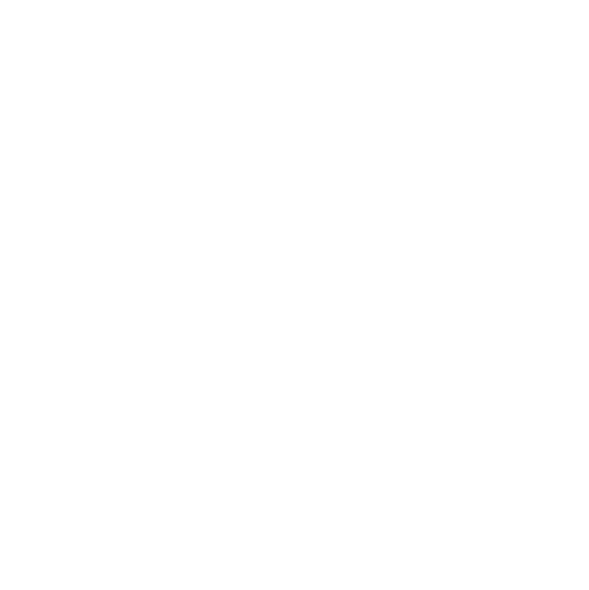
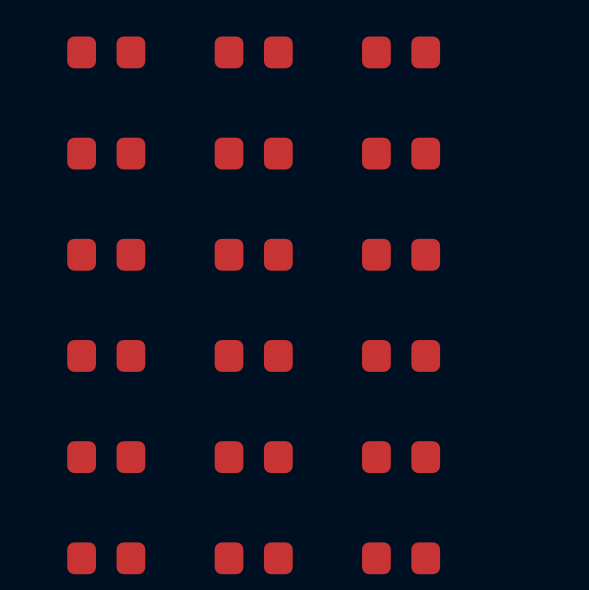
part: none -> (106, 52)
part: none -> (253, 52)
part: none -> (401, 52)
part: none -> (106, 153)
part: none -> (253, 153)
part: none -> (401, 153)
part: none -> (106, 254)
part: none -> (253, 254)
part: none -> (401, 254)
part: none -> (106, 355)
part: none -> (253, 355)
part: none -> (401, 355)
part: none -> (106, 457)
part: none -> (253, 457)
part: none -> (401, 457)
part: none -> (106, 558)
part: none -> (253, 558)
part: none -> (401, 558)

